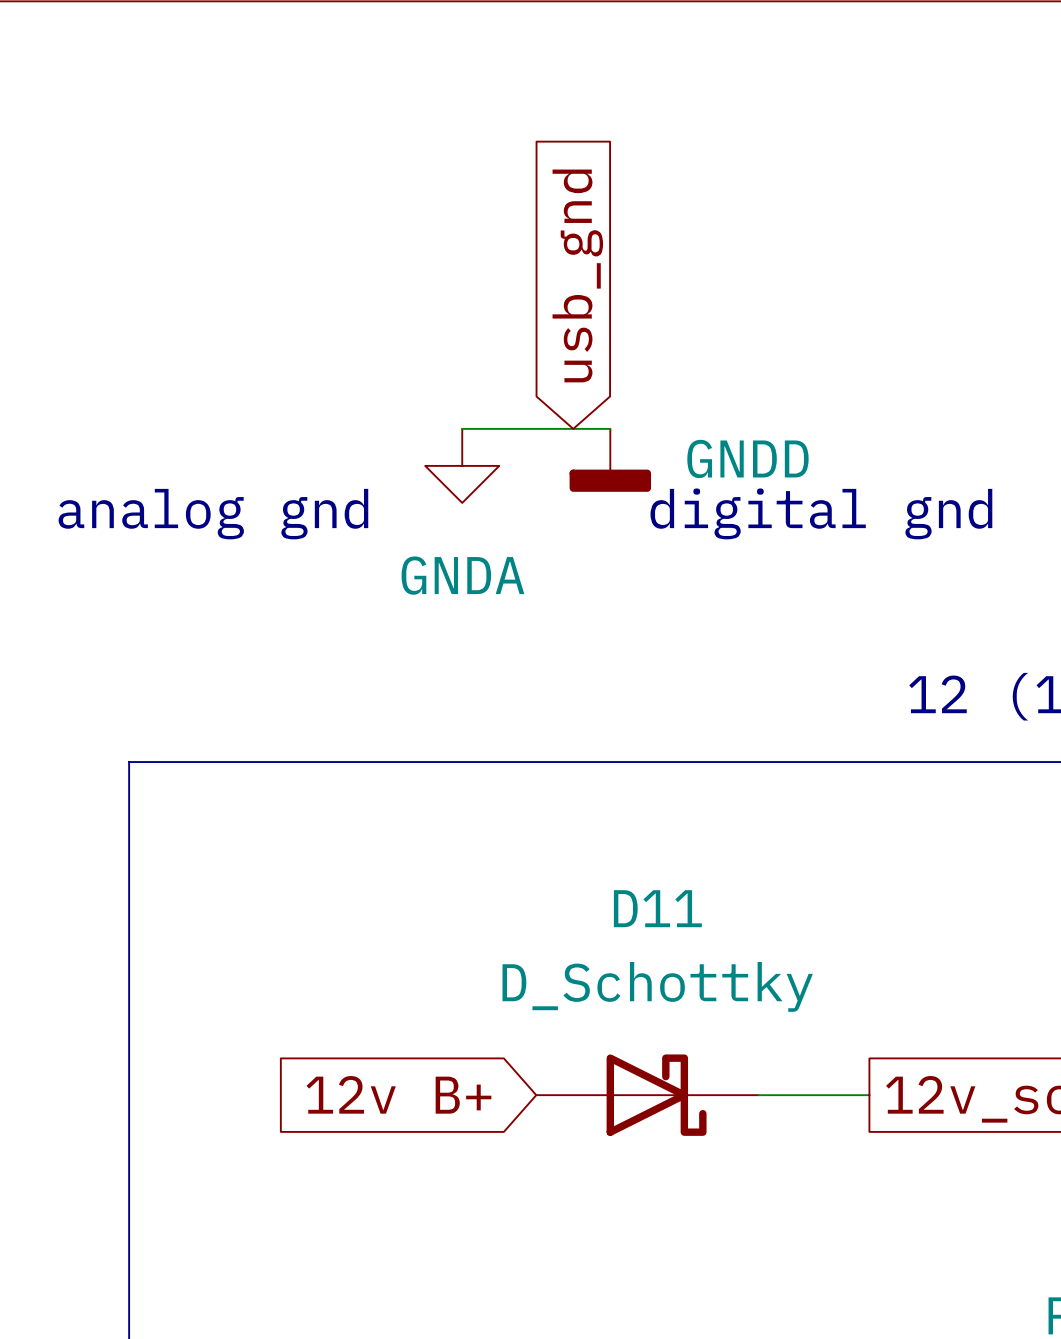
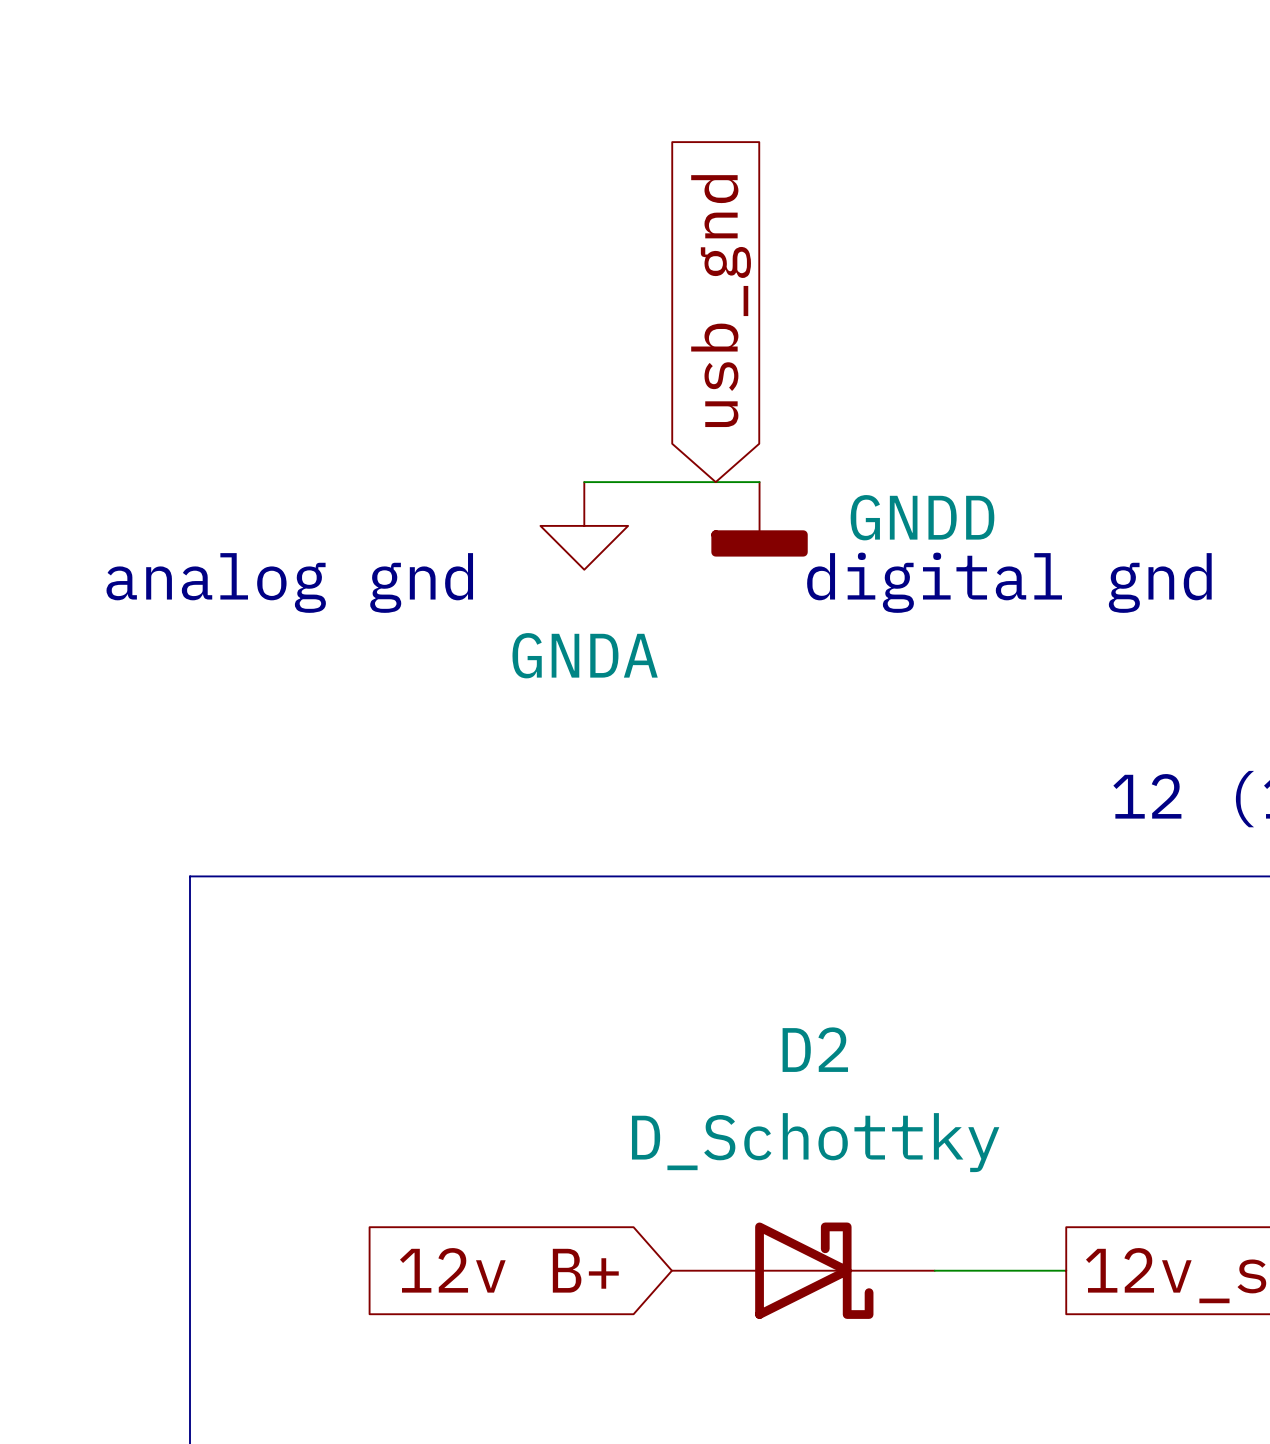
D11 name: D11 (657, 908) -> D2 (815, 1049)

